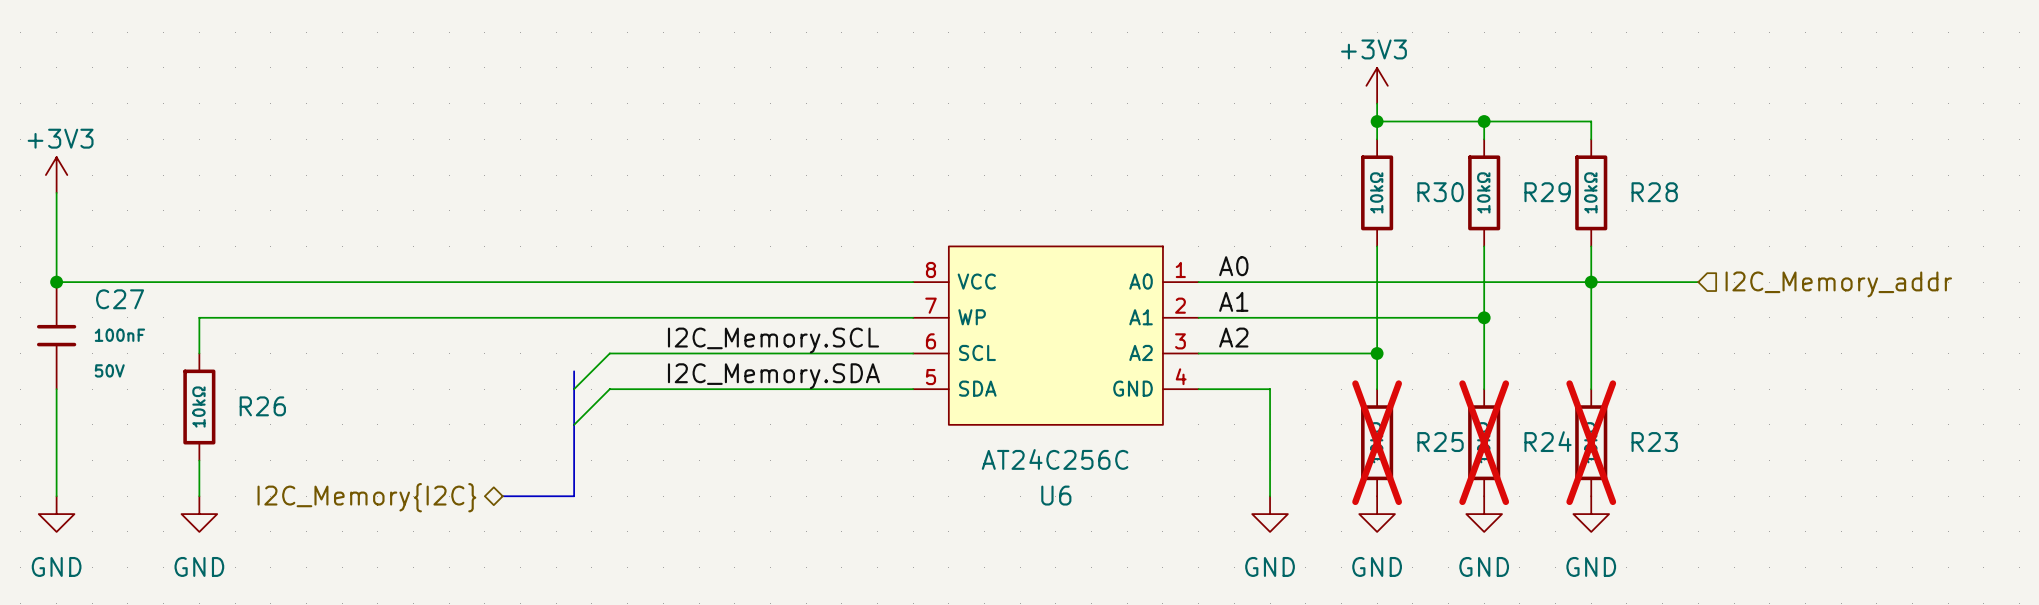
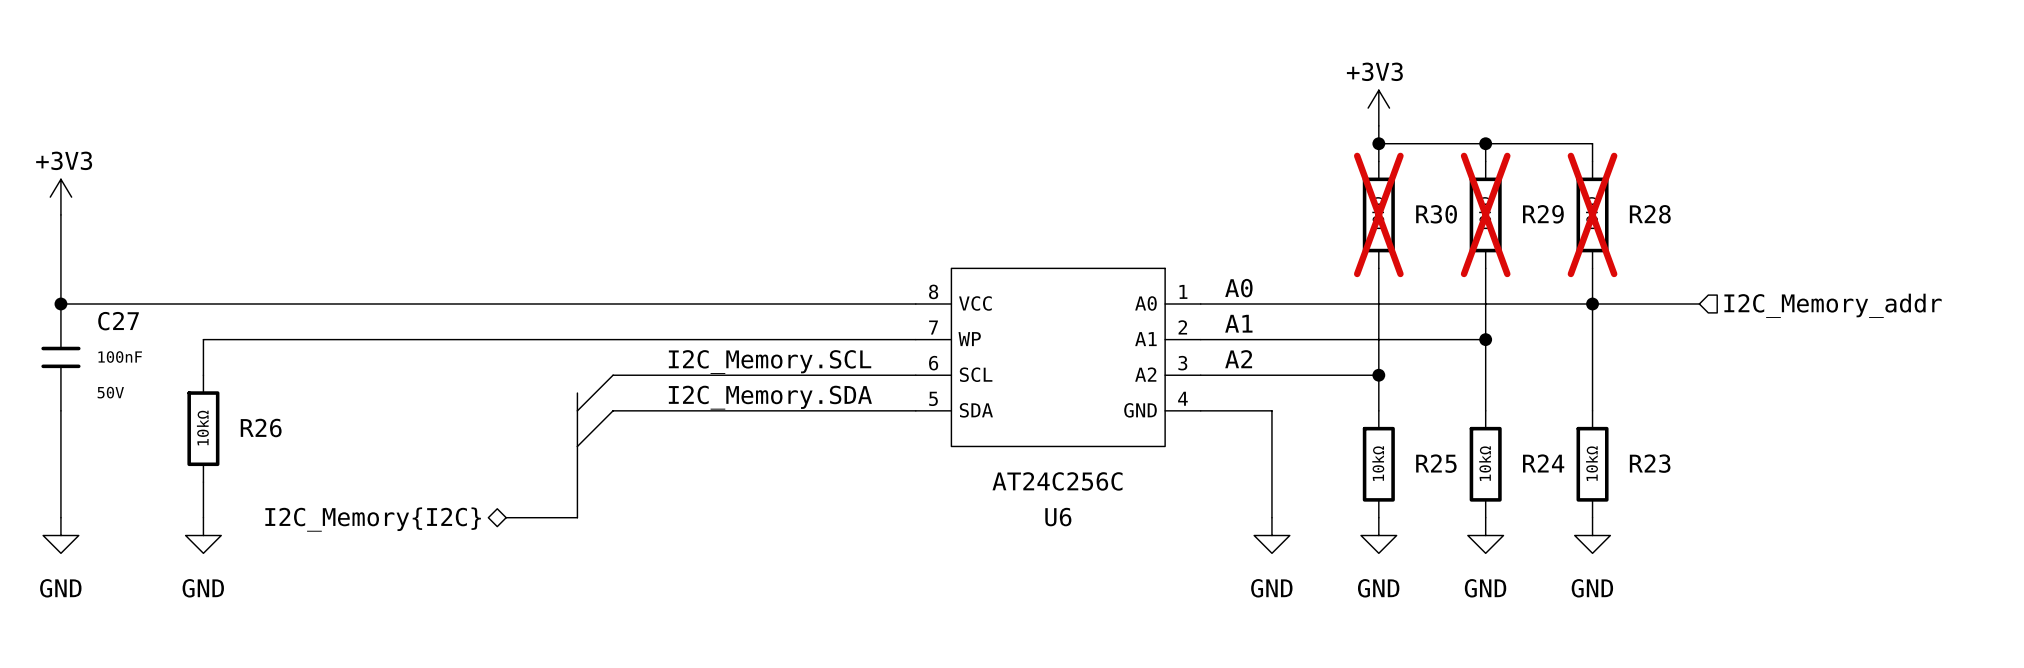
R30 do-not-place cross: none -> (1378, 214)
R29 do-not-place cross: none -> (1485, 214)
R28 do-not-place cross: none -> (1592, 214)
R25 do-not-place cross: (1377, 442) -> none
R24 do-not-place cross: (1484, 442) -> none
R23 do-not-place cross: (1591, 442) -> none

